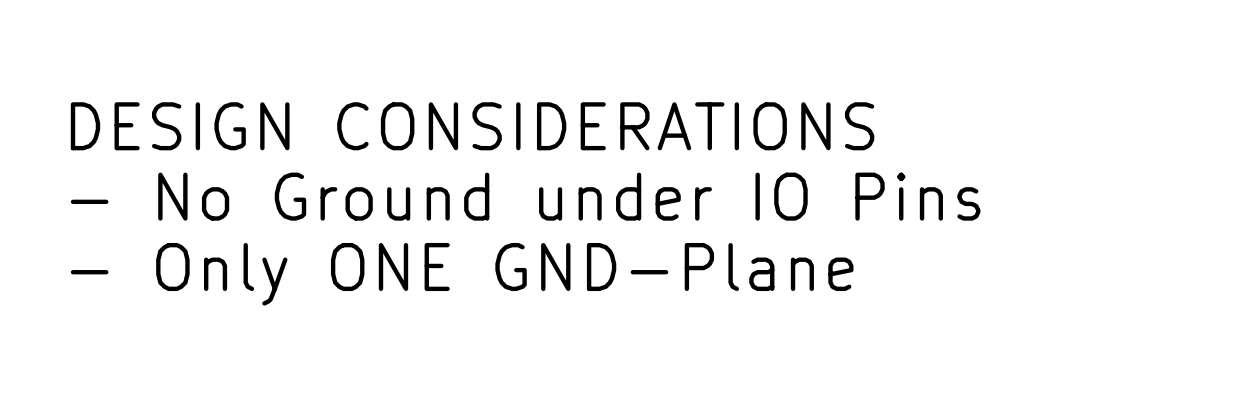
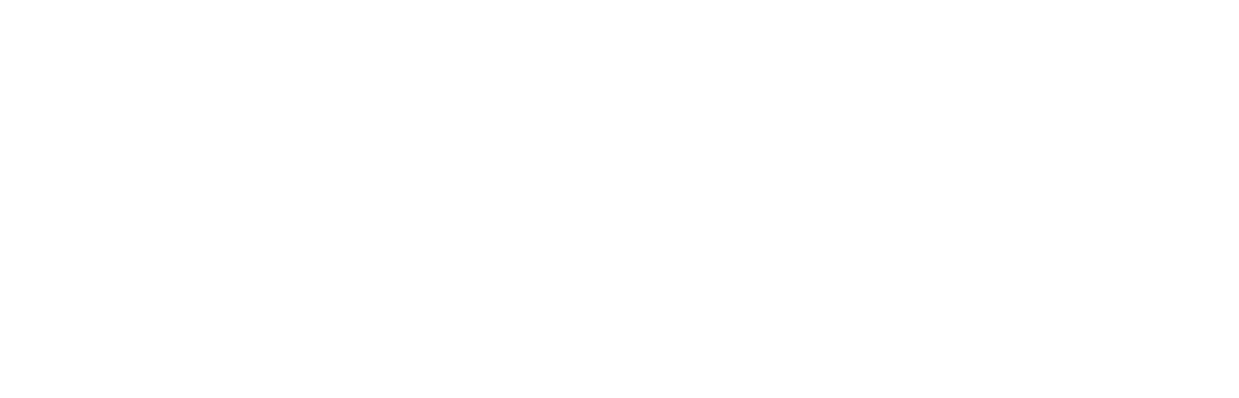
text: DESIGN CONSIDERATIONS (472, 126) -> none
text: - No Ground under IO Pins (525, 196) -> none
text: - Only ONE GND-Plane (462, 274) -> none

